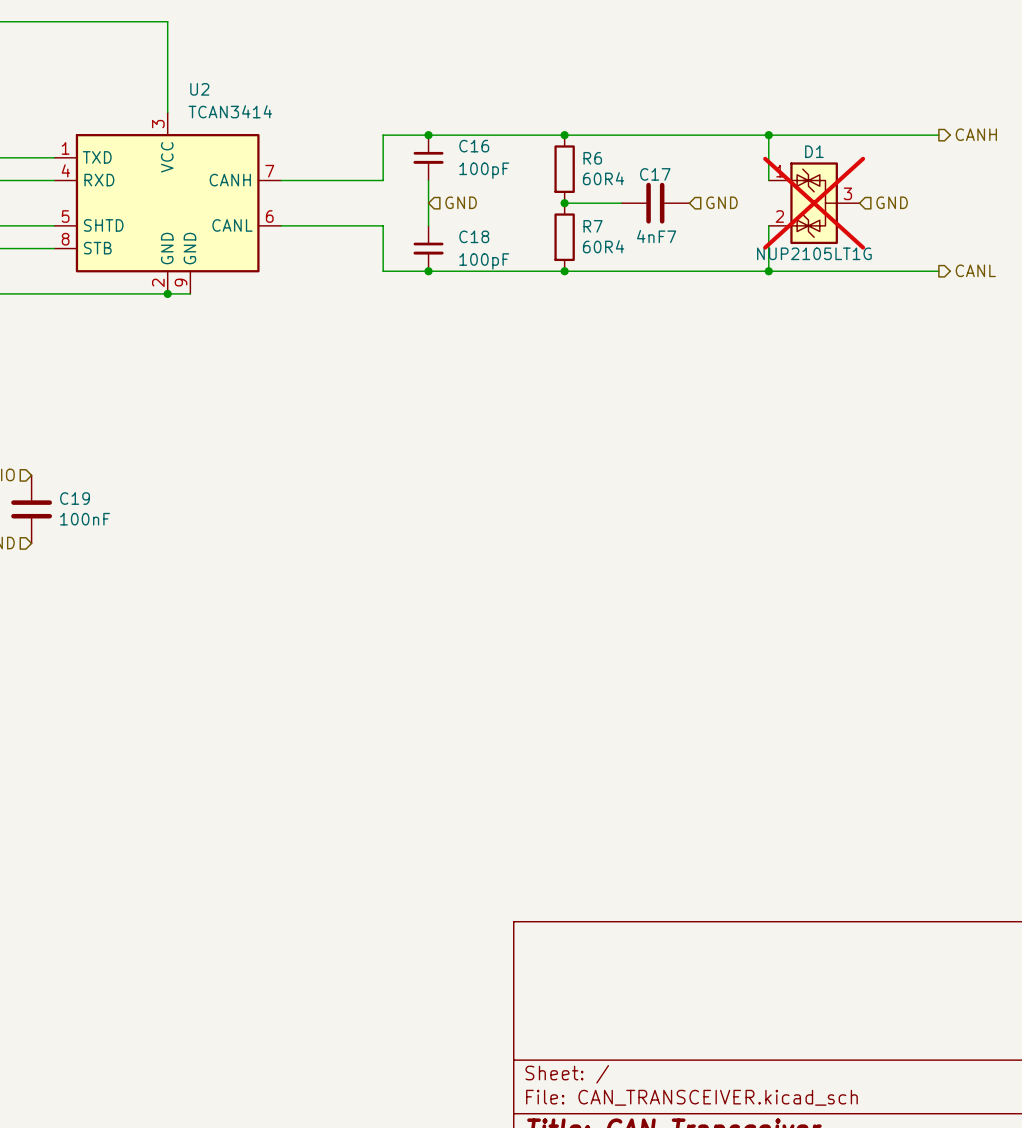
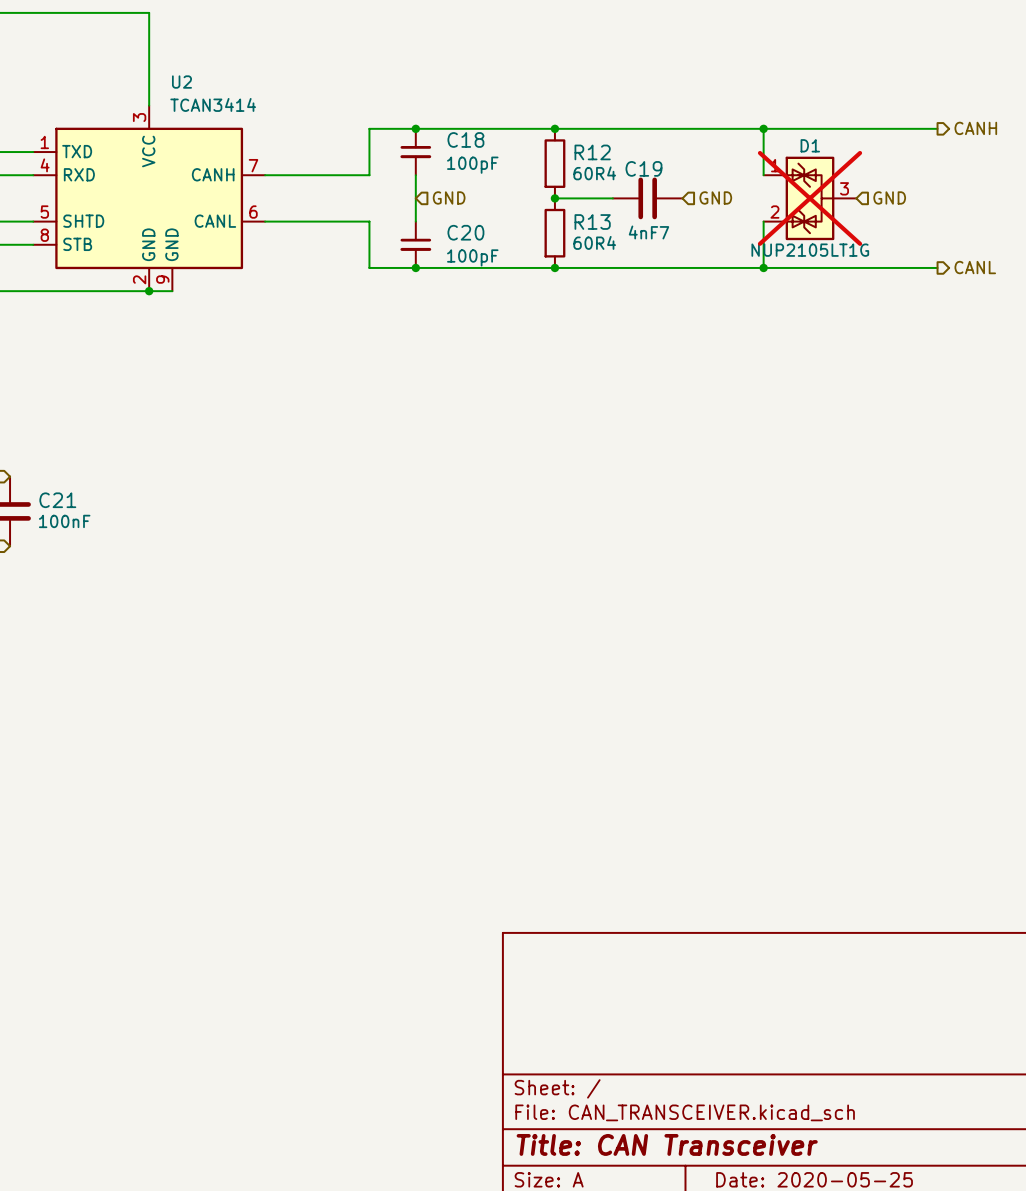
C16 name: C16 (474, 146) -> C18 (465, 139)
R6 name: R6 (592, 158) -> R12 (592, 152)
C17 name: C17 (655, 174) -> C19 (643, 168)
R7 name: R7 (593, 226) -> R13 (592, 222)
C18 name: C18 (474, 236) -> C20 (465, 232)
C19 name: C19 (75, 498) -> C21 (57, 500)

